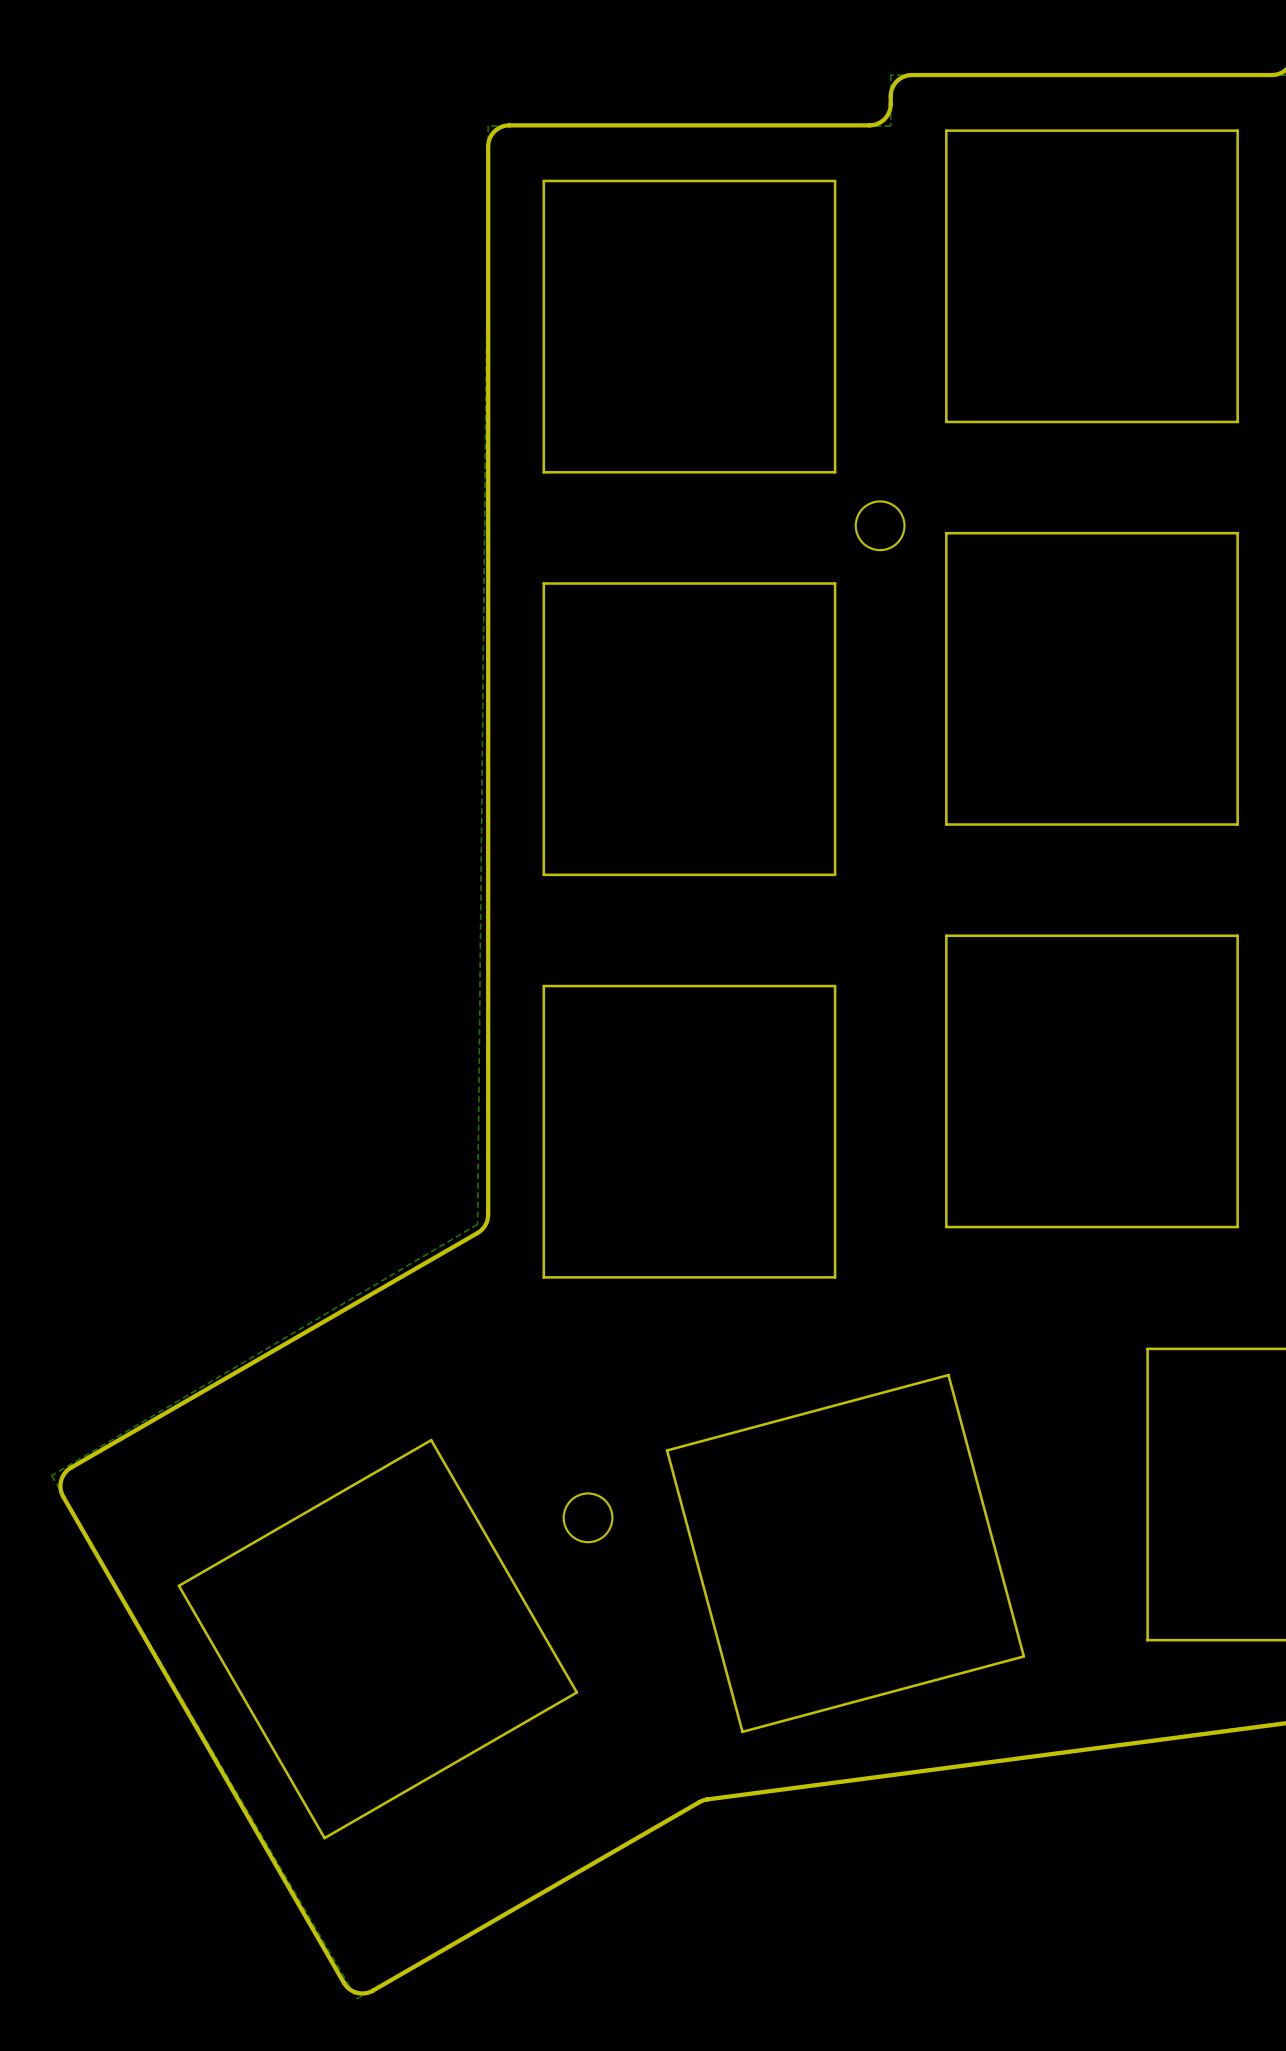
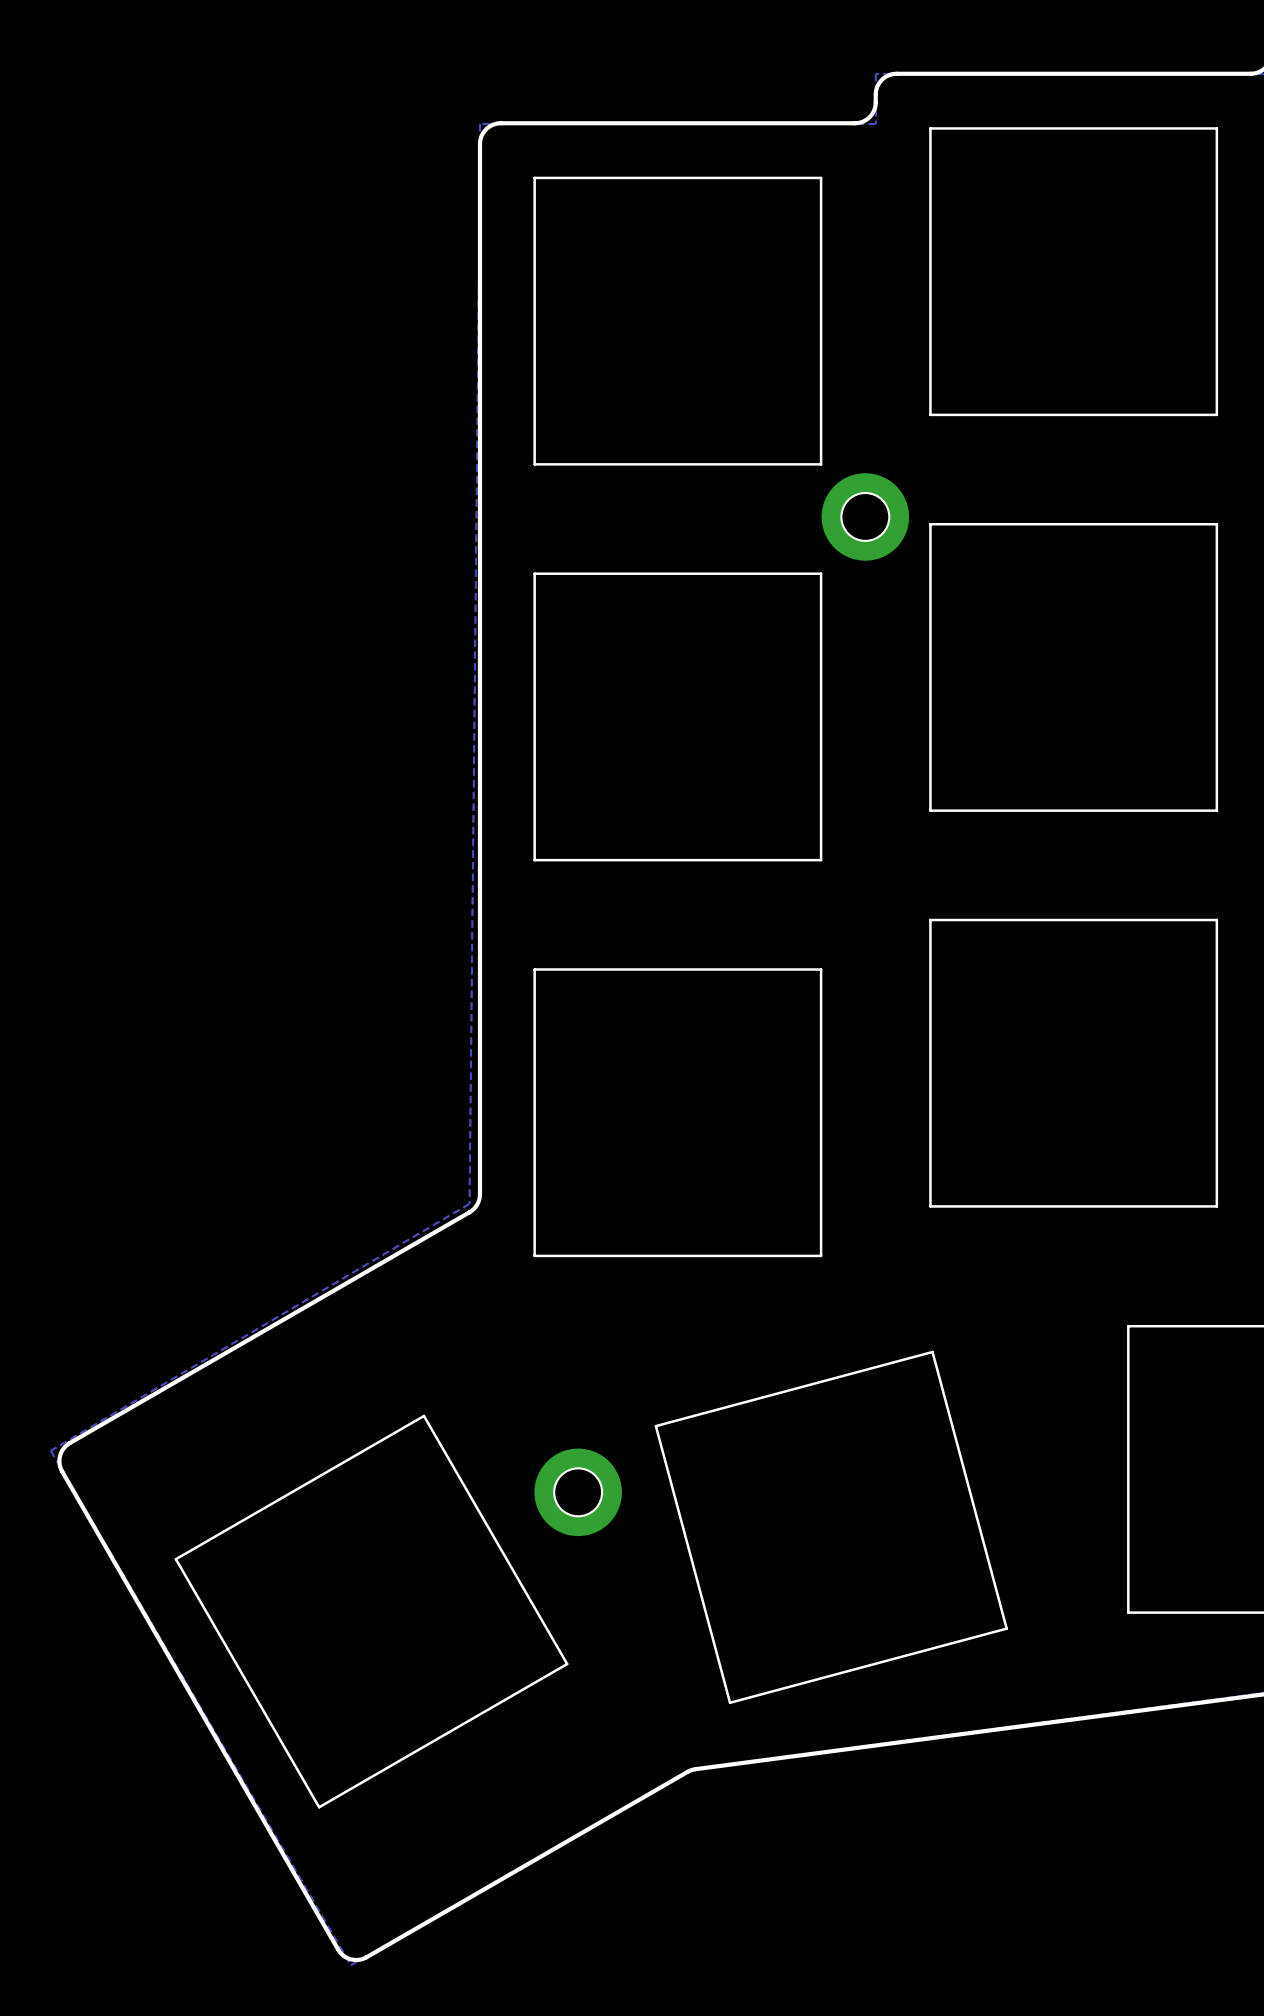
drawing: [854, 500, 906, 552] -> none
part: none -> (865, 516)
drawing: [562, 1492, 614, 1544] -> none
part: none -> (578, 1492)

